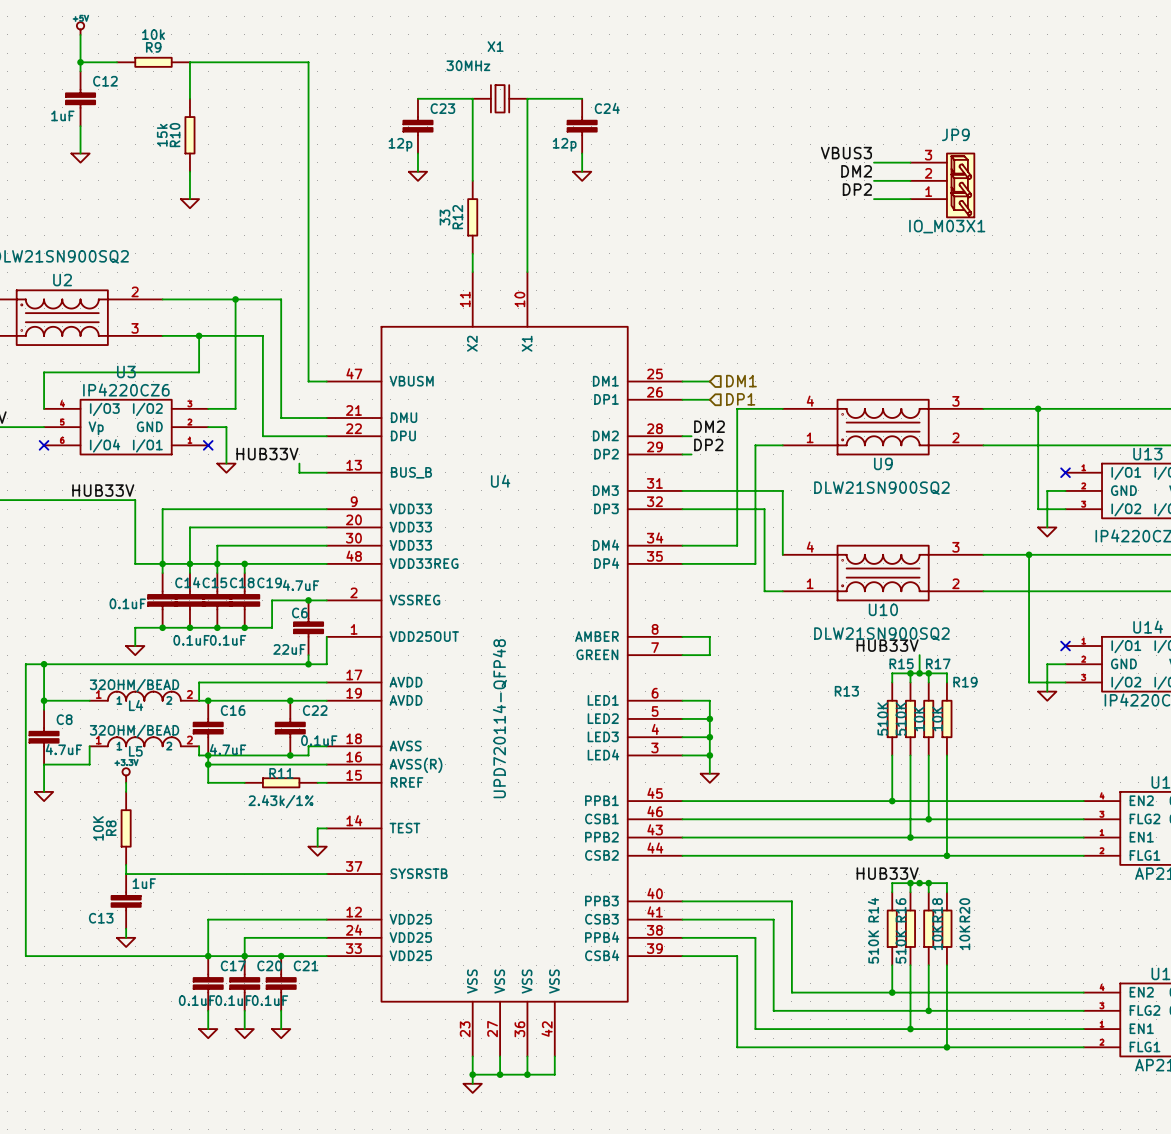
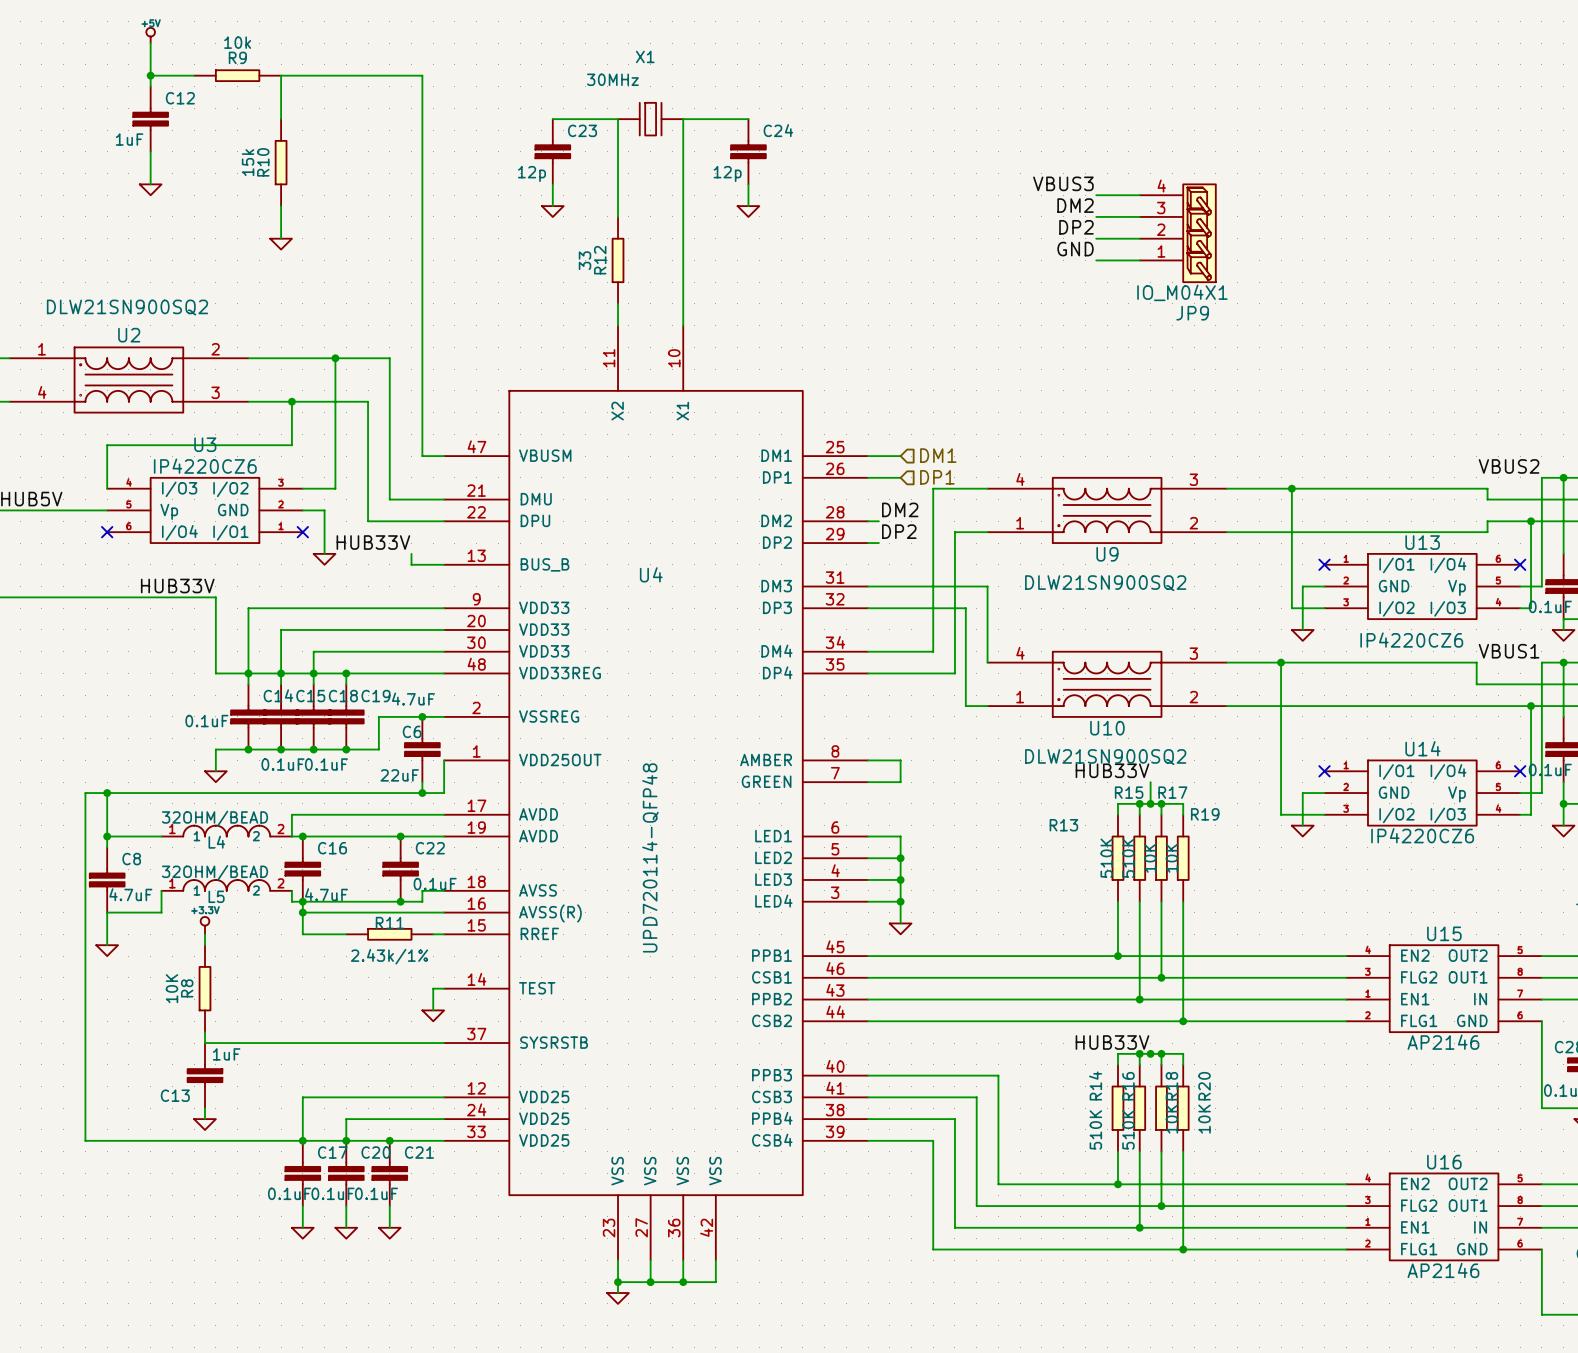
JP9 name position: JP9 (955, 134) -> JP9 (1192, 313)
JP9 symbol: [910, 153, 975, 218] -> [1139, 184, 1216, 283]
label: none -> GND (1075, 249)
wire: none -> (1096, 260) (1139, 260)
JP9 value: IO_M03X1 (947, 226) -> IO_M04X1 (1182, 292)

